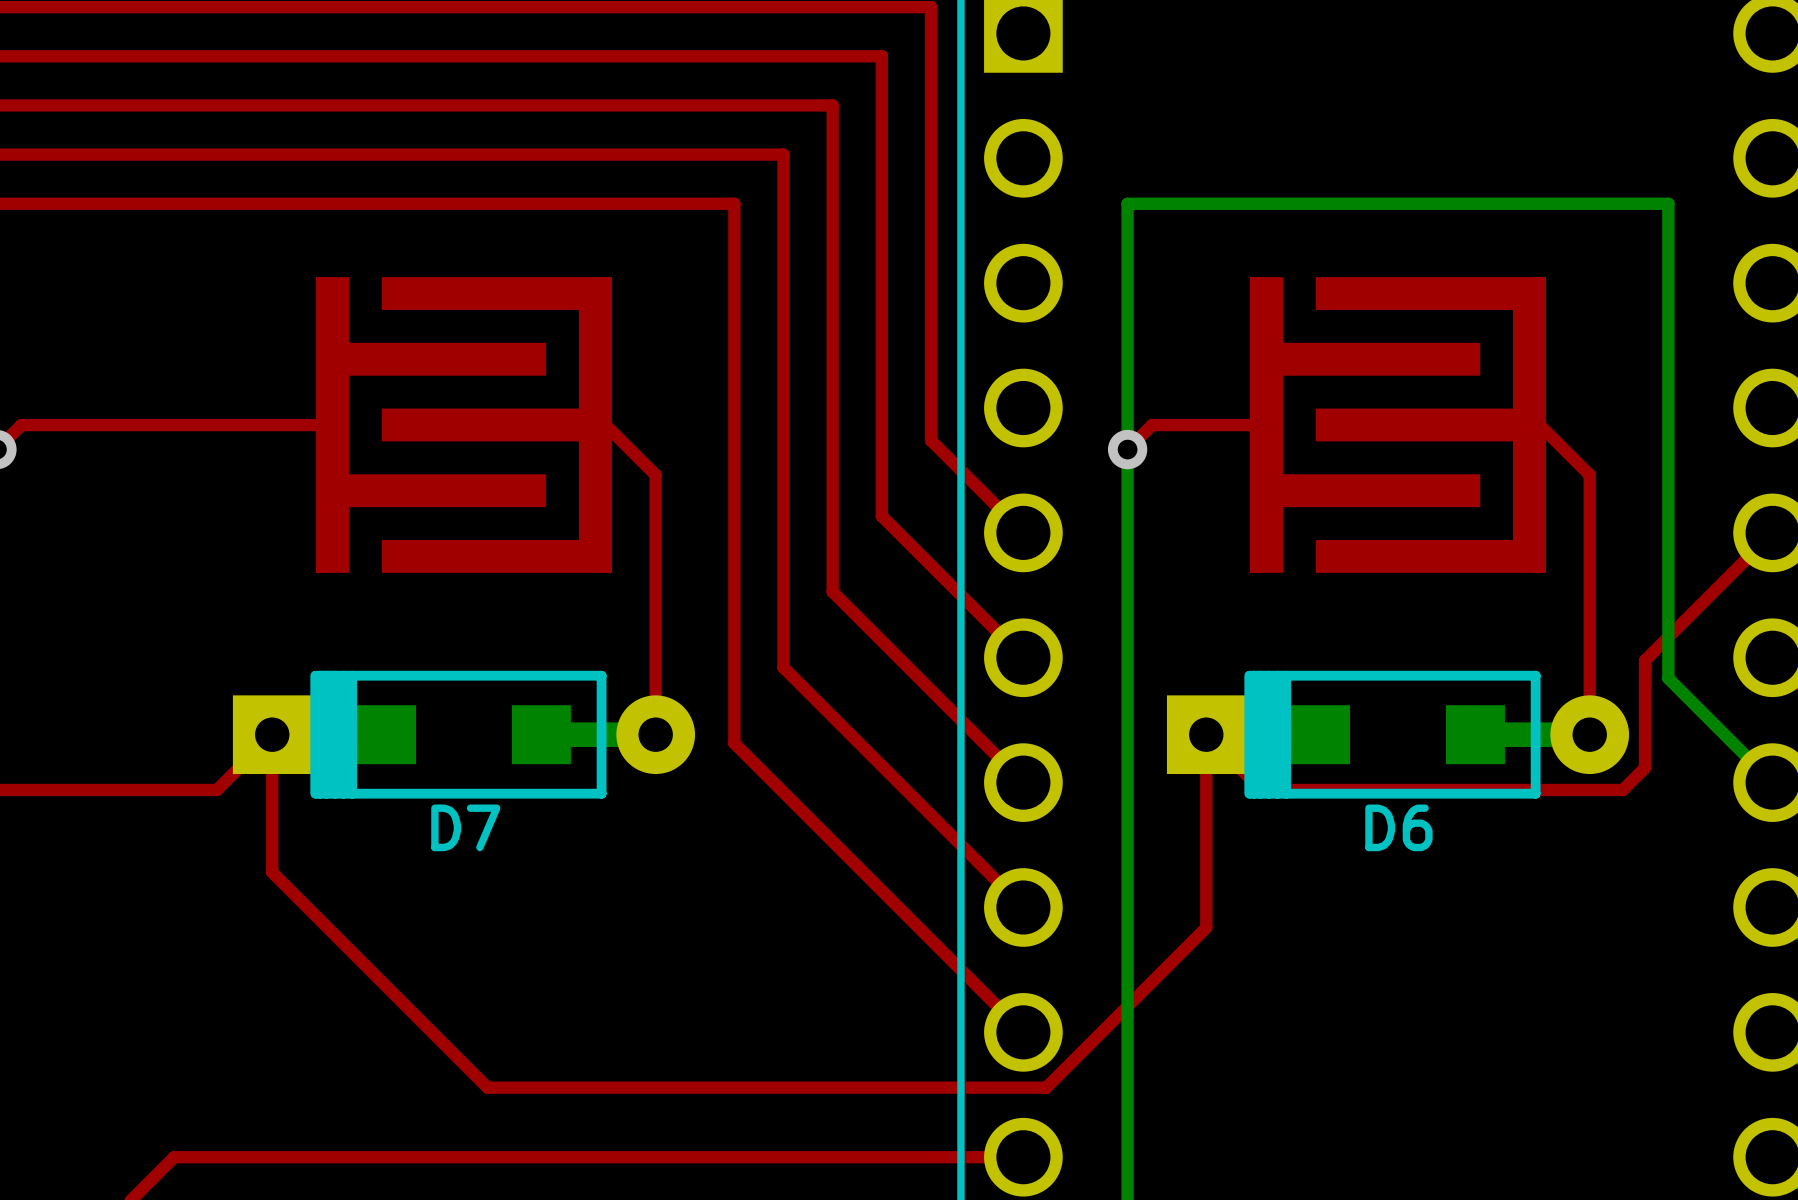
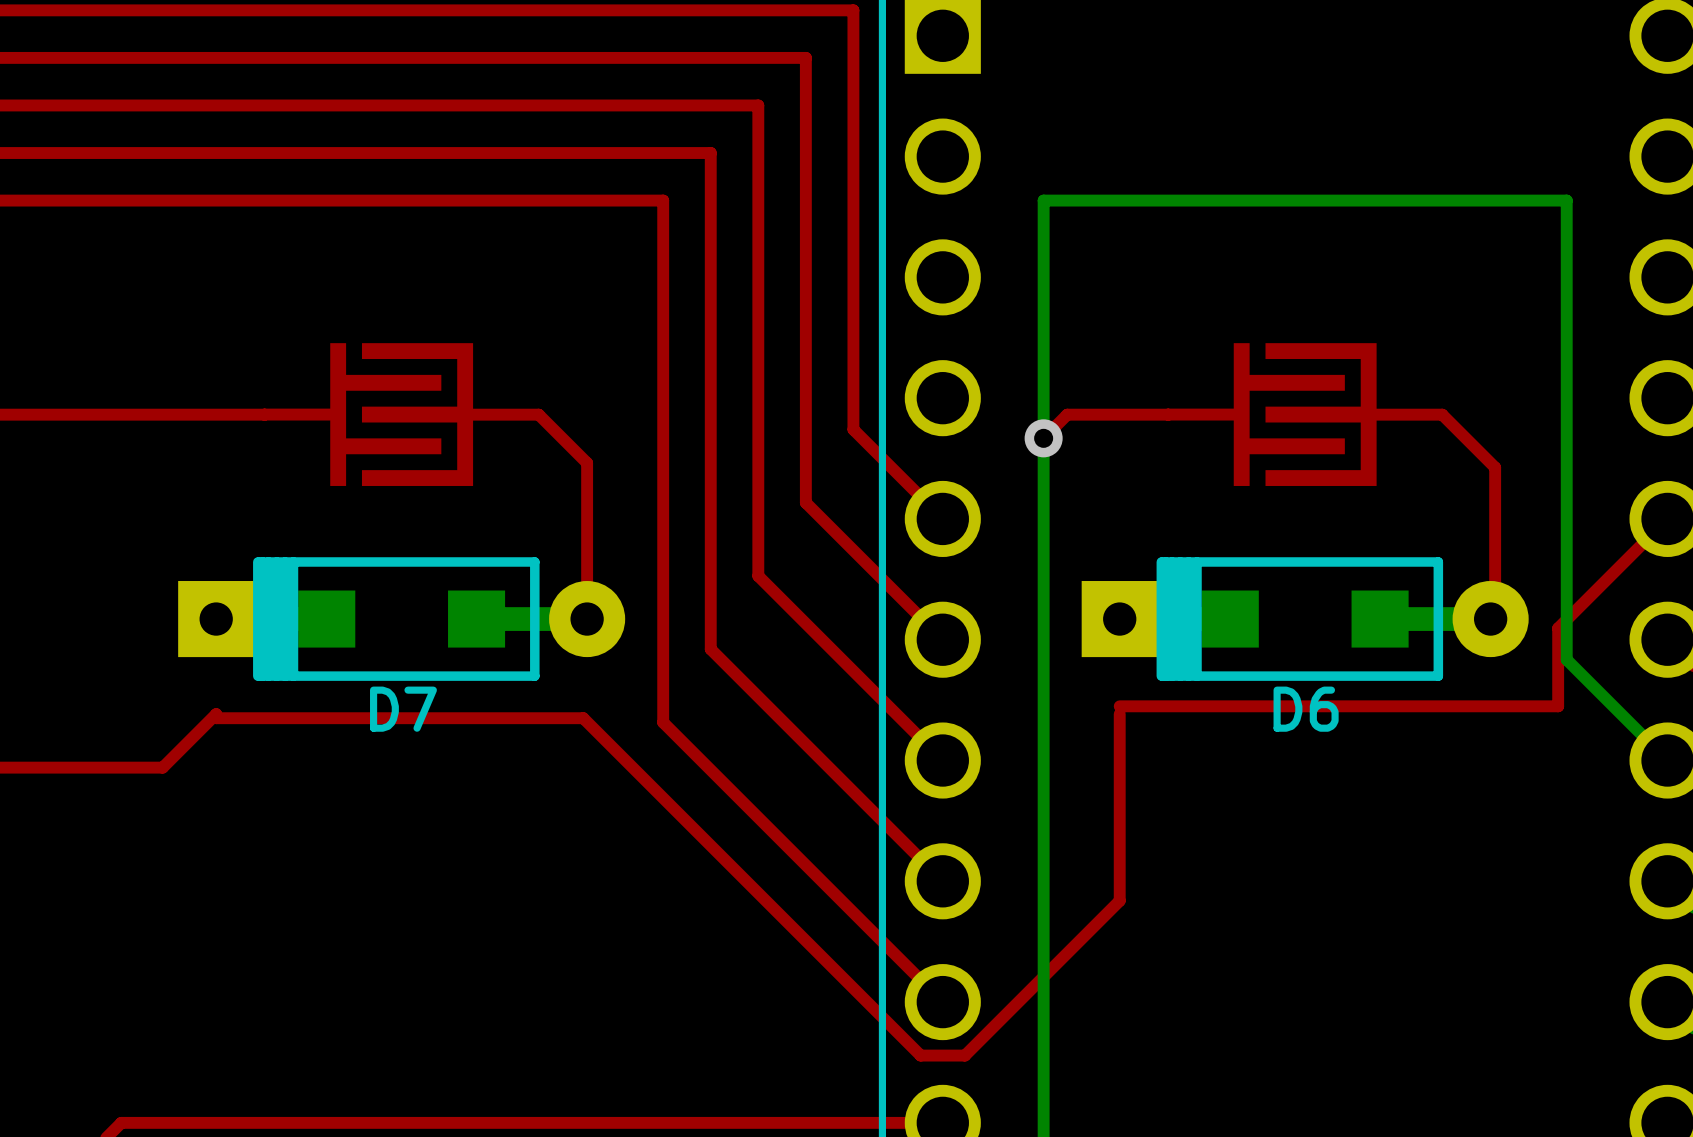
part footprint: [316, 277, 612, 573] -> [330, 343, 474, 486]
part footprint: [1250, 277, 1546, 573] -> [1233, 343, 1377, 486]
top track: none -> (464, 413) (538, 414)
top track: none -> (1367, 413) (1442, 414)
top track: (1589, 475) (1589, 734) -> (1490, 463) (1495, 467) (1495, 614) (1490, 619)
top track: (655, 636) (655, 734) -> none
top track: (1659, 645) (1644, 660) (1644, 767) (1622, 789) (1261, 789) (1206, 734) -> (1558, 628) (1558, 706) (1119, 706)
D7 position: (463, 734) -> (401, 619)
D6 position: (1397, 734) -> (1305, 619)
top track: (272, 738) (272, 872) (487, 1087) (1000, 1087) -> (216, 718) (583, 718) (920, 1055)

